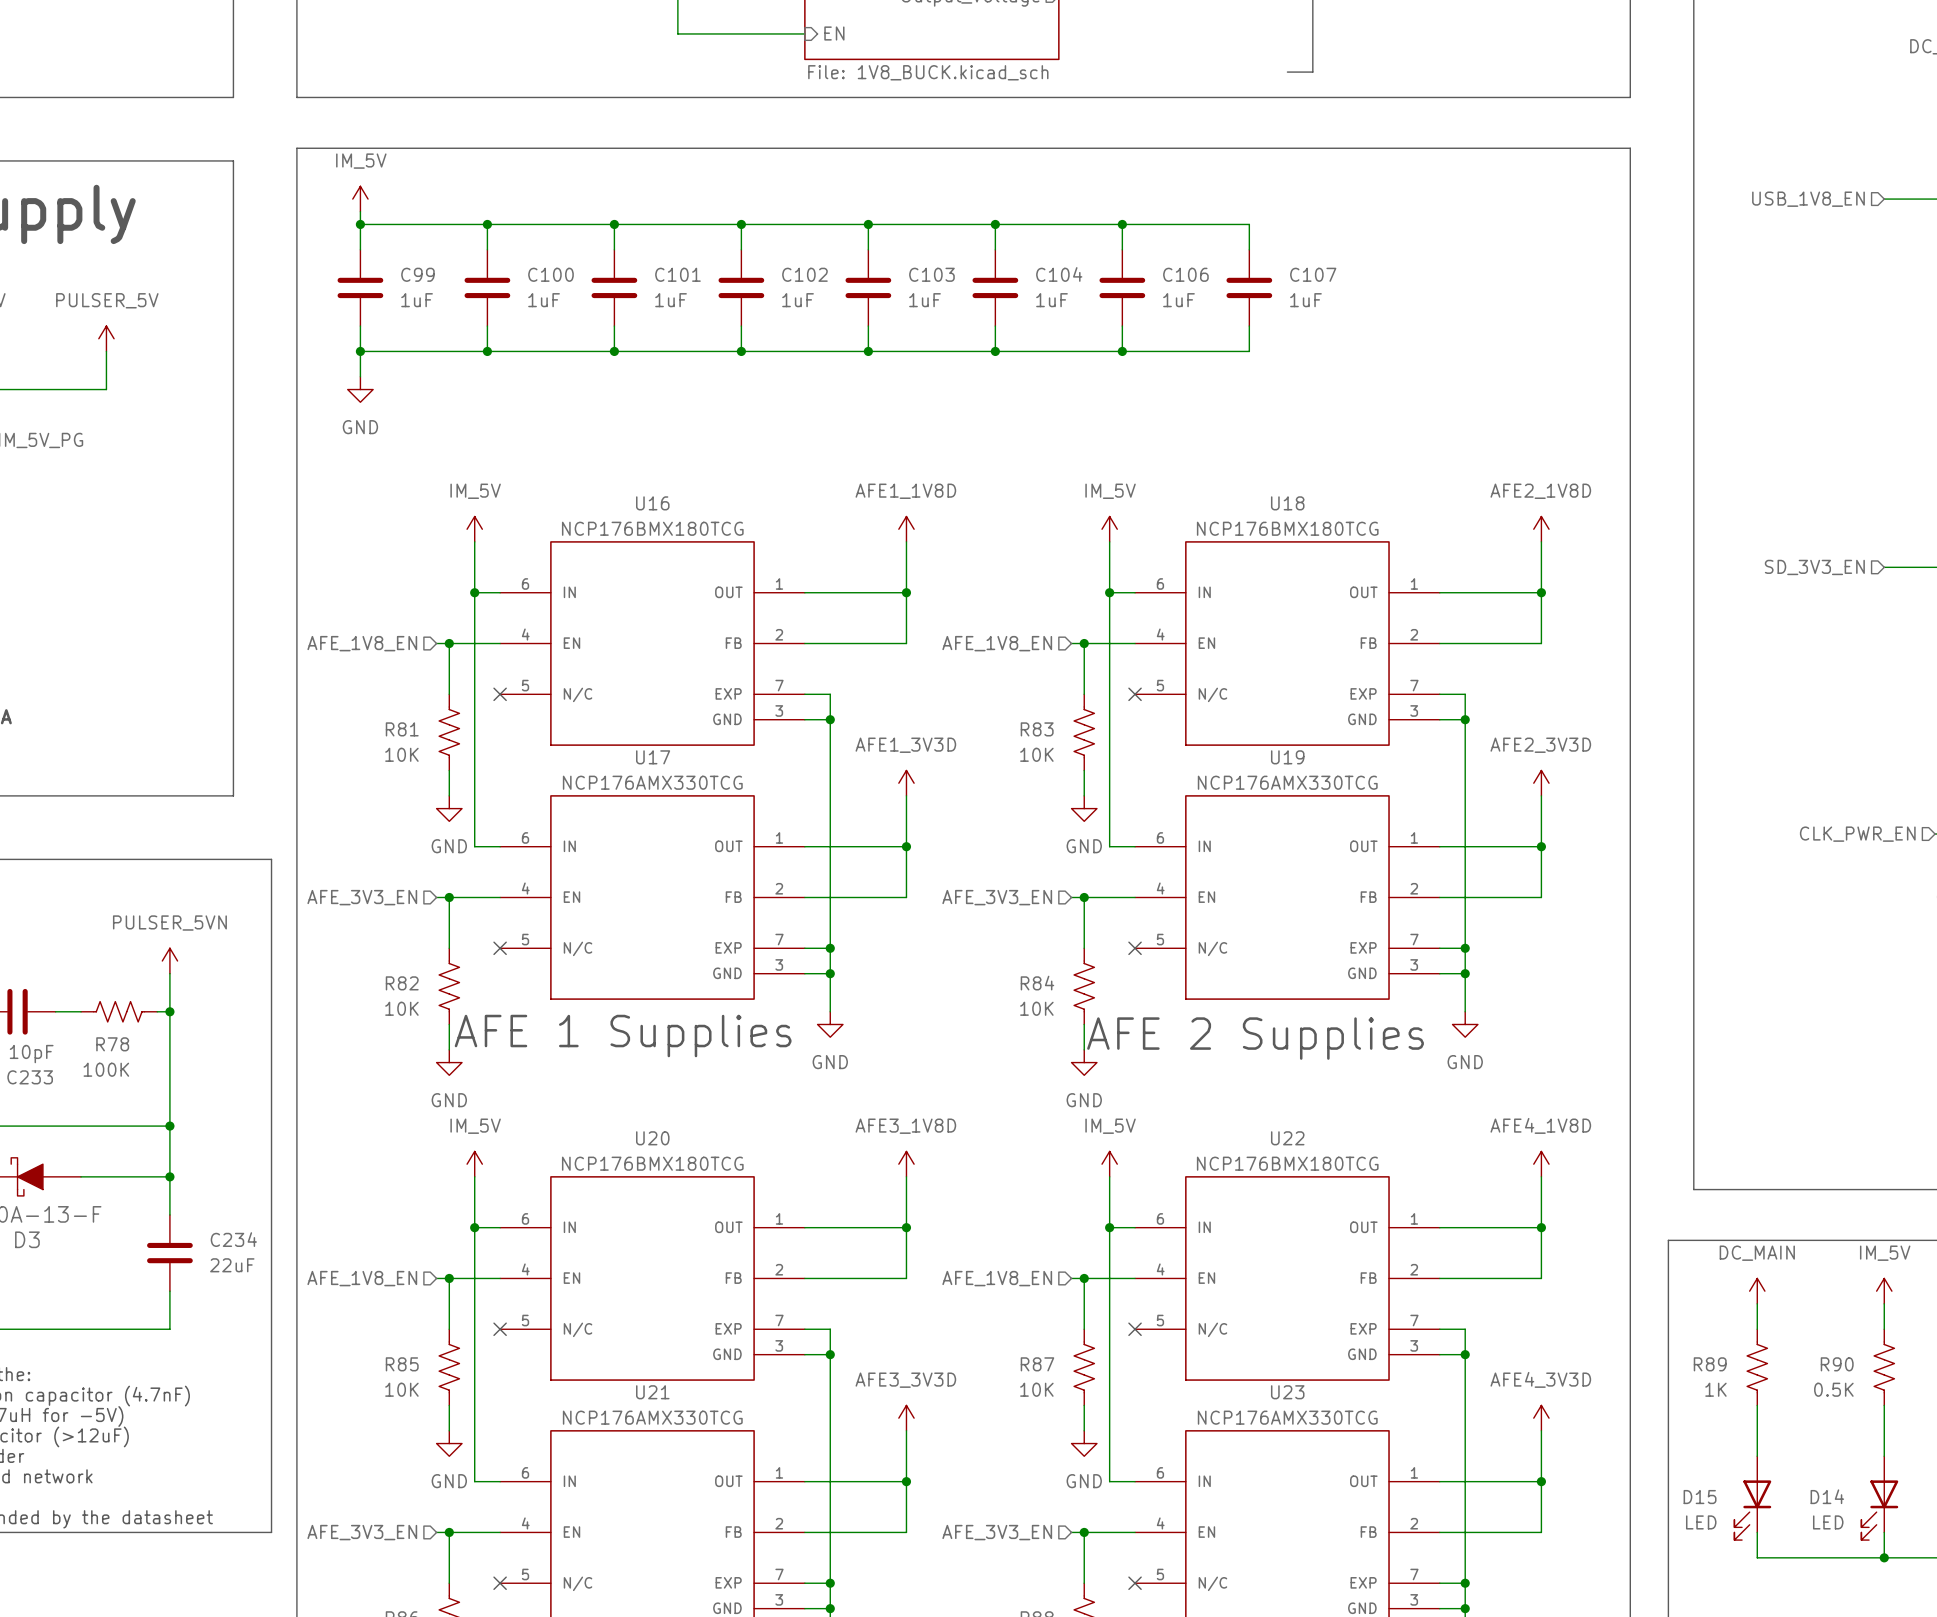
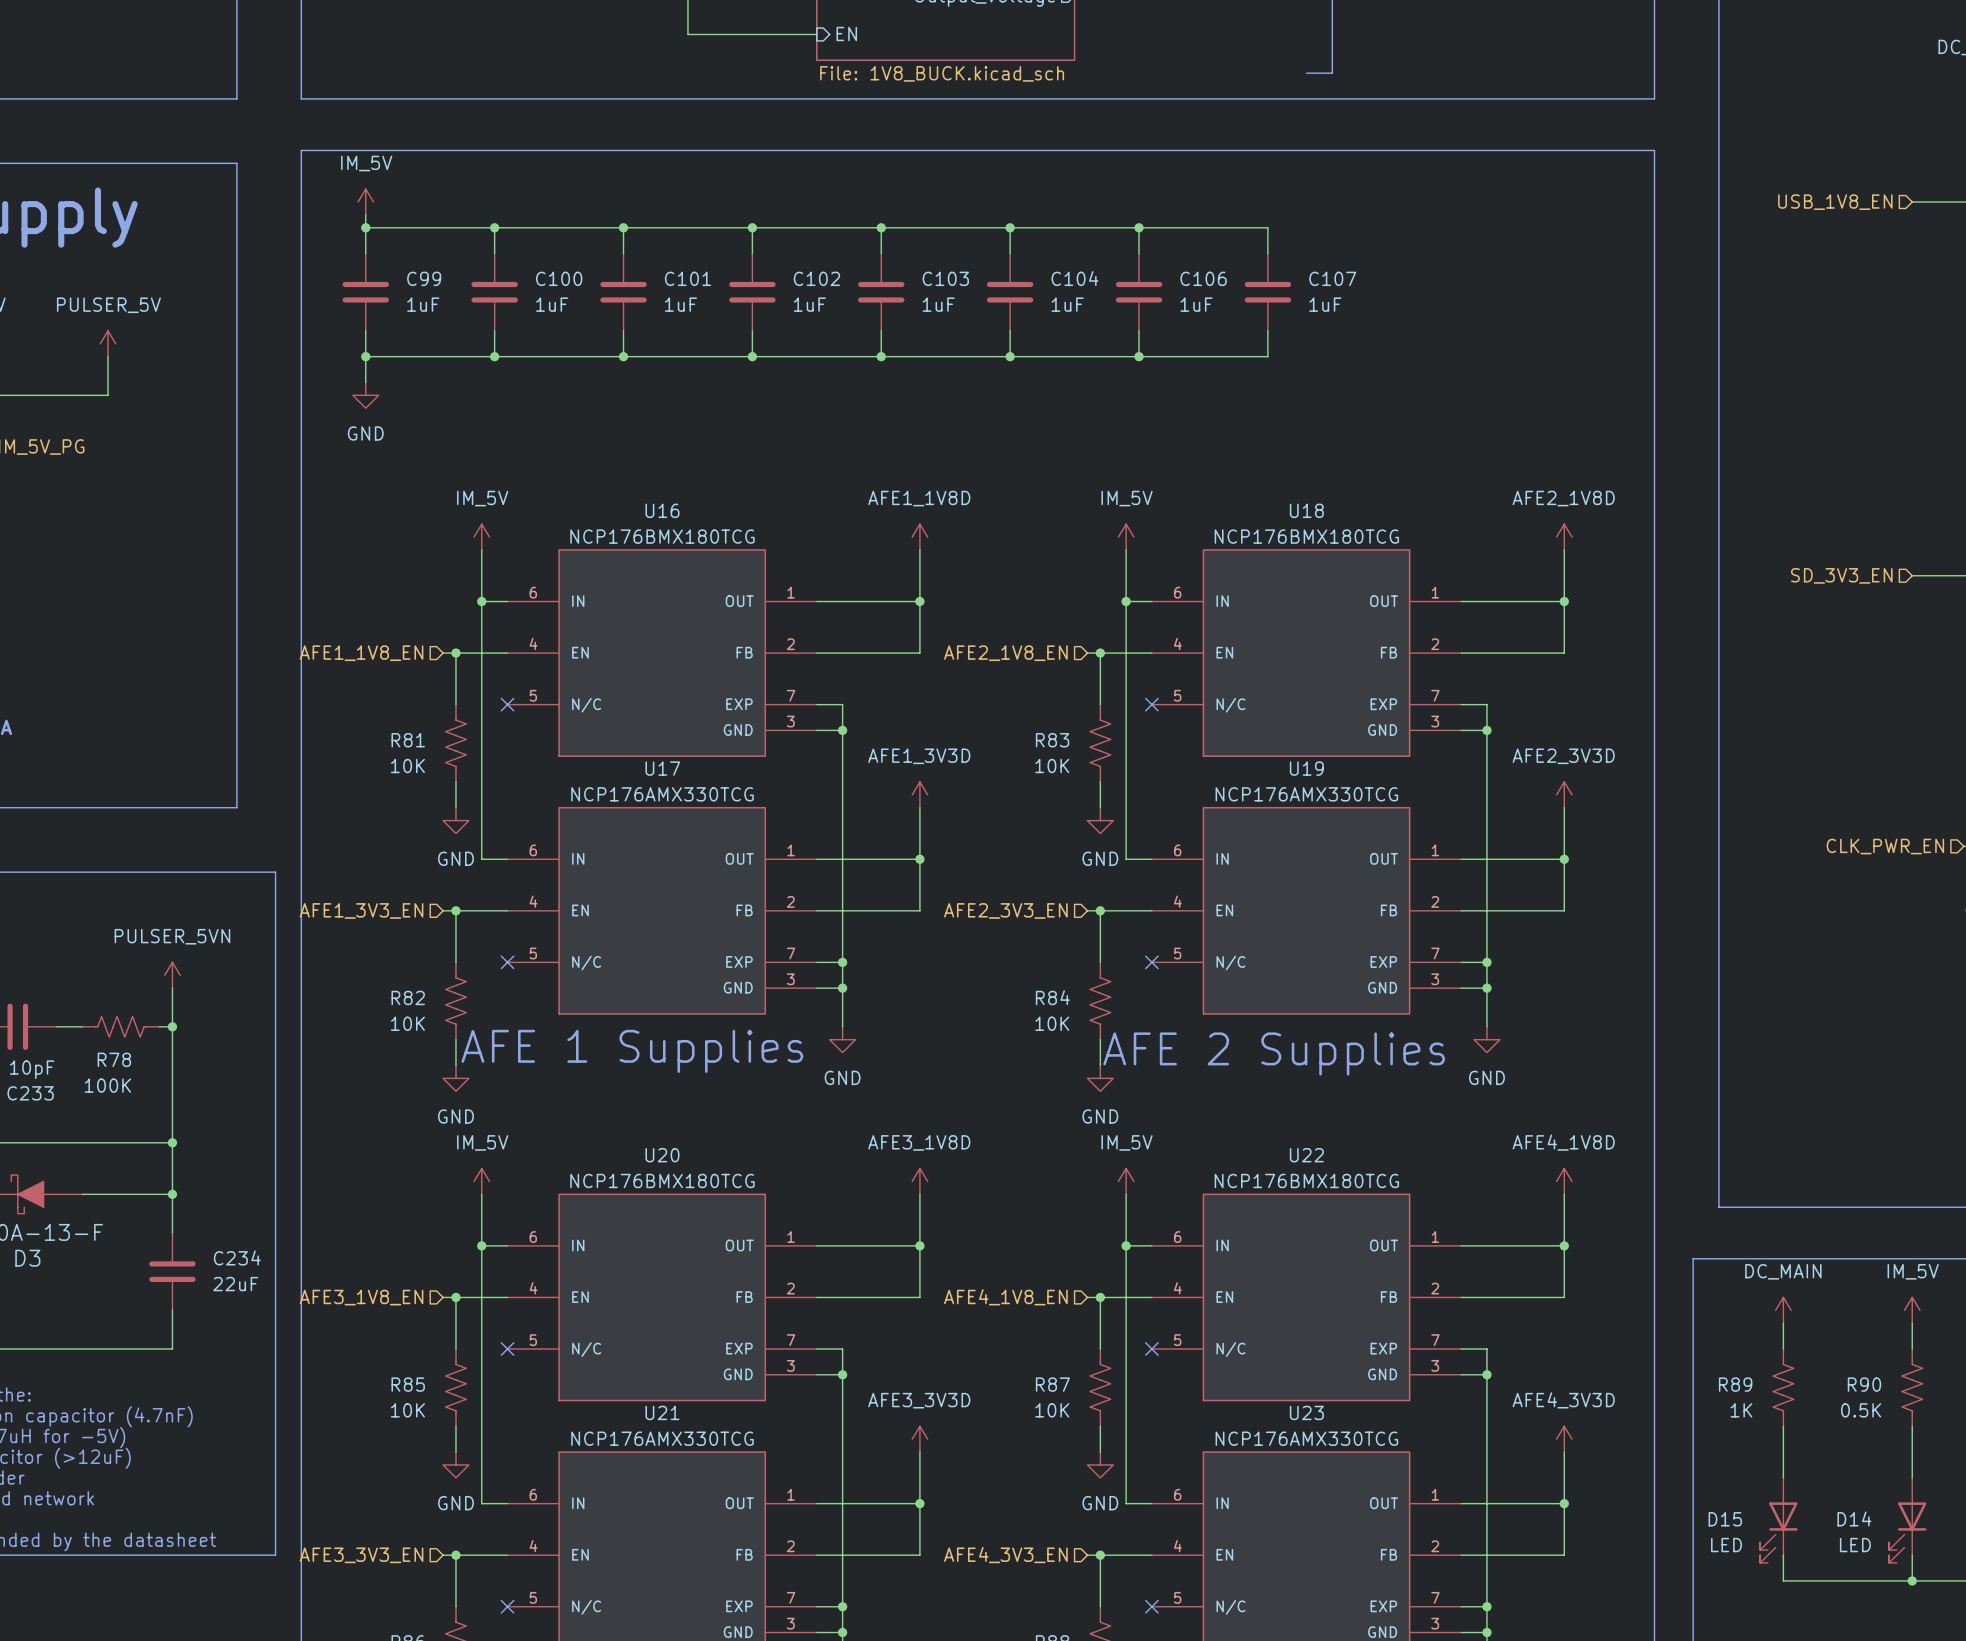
hierarchical label: AFE_1V8_EN (362, 643) -> AFE1_1V8_EN (361, 653)
hierarchical label: AFE_1V8_EN (997, 643) -> AFE2_1V8_EN (1005, 653)
hierarchical label: AFE_3V3_EN (362, 897) -> AFE1_3V3_EN (361, 910)
hierarchical label: AFE_3V3_EN (997, 897) -> AFE2_3V3_EN (1005, 910)
hierarchical label: AFE_1V8_EN (362, 1278) -> AFE3_1V8_EN (361, 1297)
hierarchical label: AFE_1V8_EN (997, 1278) -> AFE4_1V8_EN (1005, 1297)
hierarchical label: AFE_3V3_EN (362, 1532) -> AFE3_3V3_EN (361, 1555)
hierarchical label: AFE_3V3_EN (997, 1532) -> AFE4_3V3_EN (1005, 1555)

